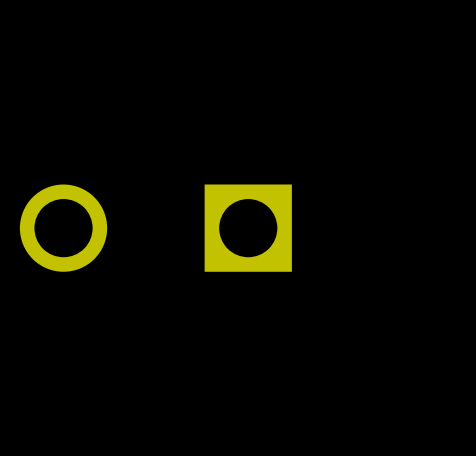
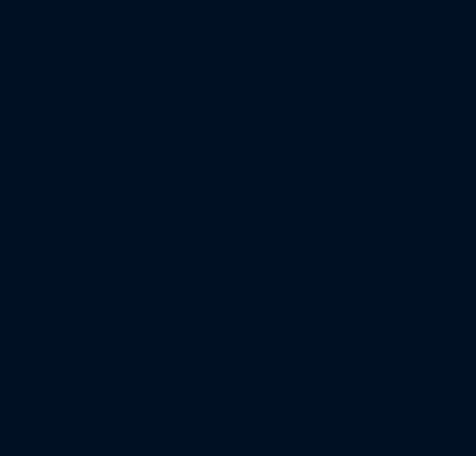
part: (155, 228) -> none

